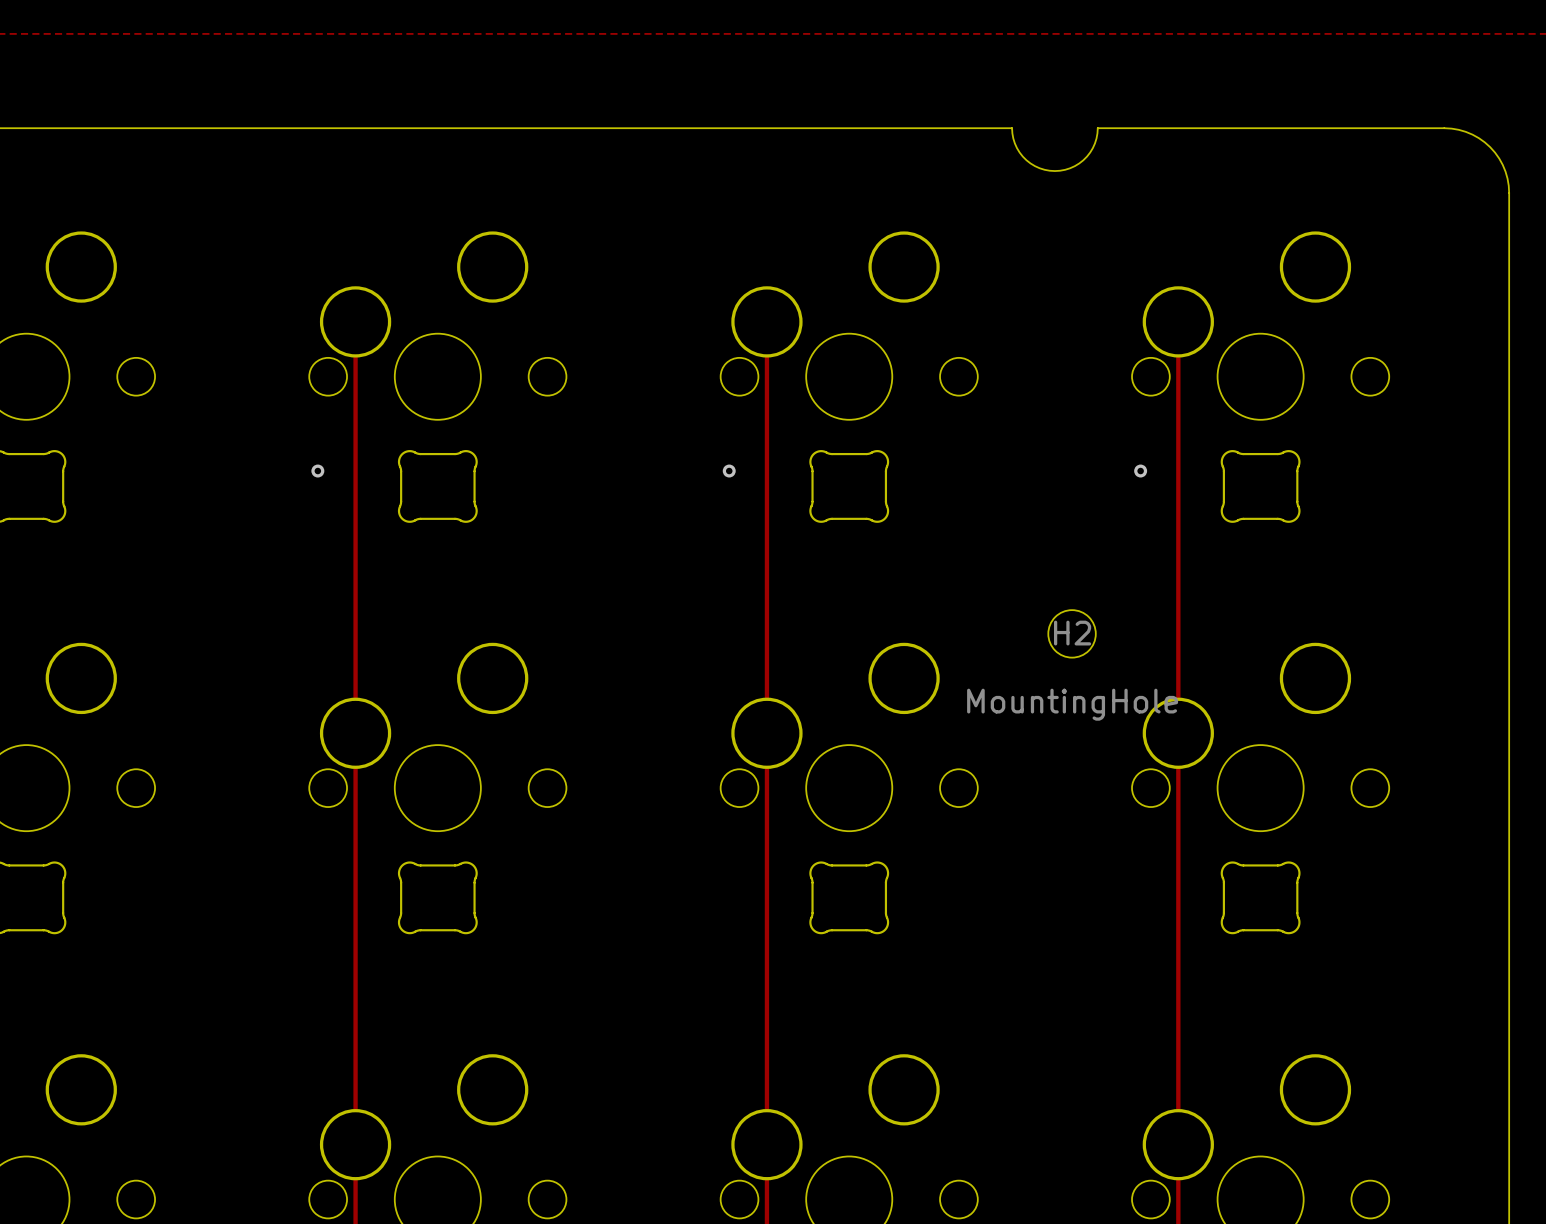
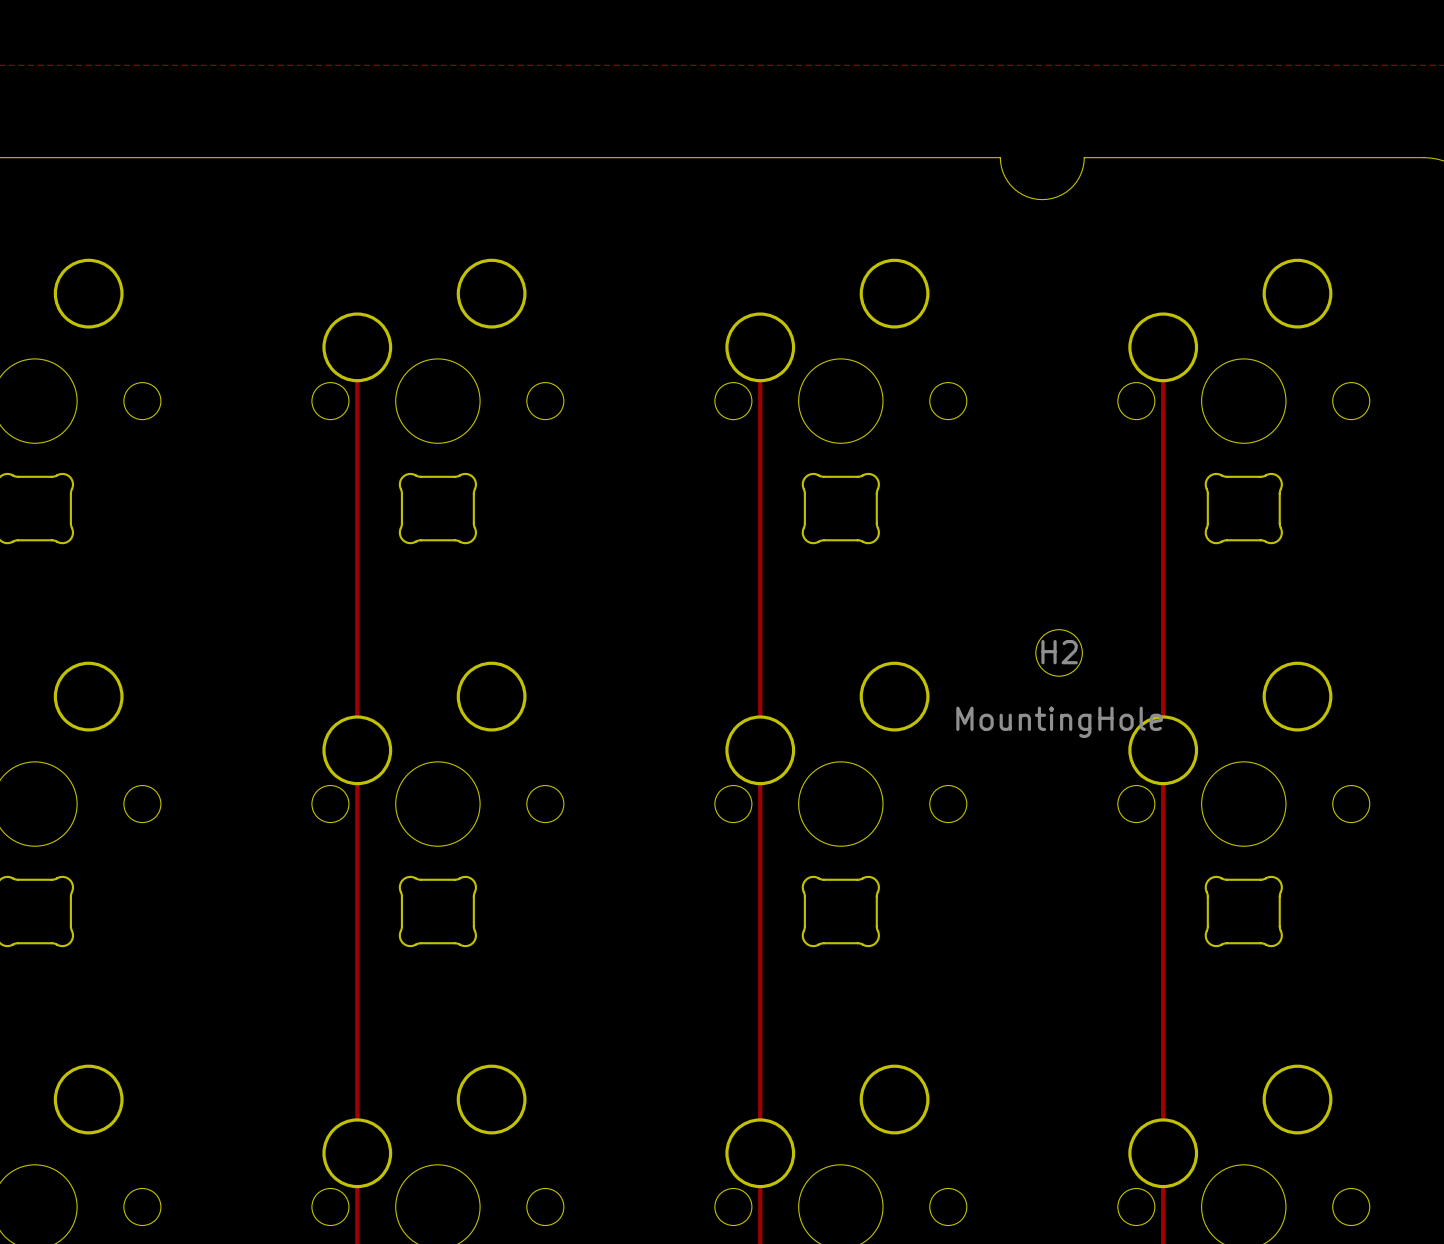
via: (317, 471) -> none
via: (729, 471) -> none
via: (1140, 471) -> none

